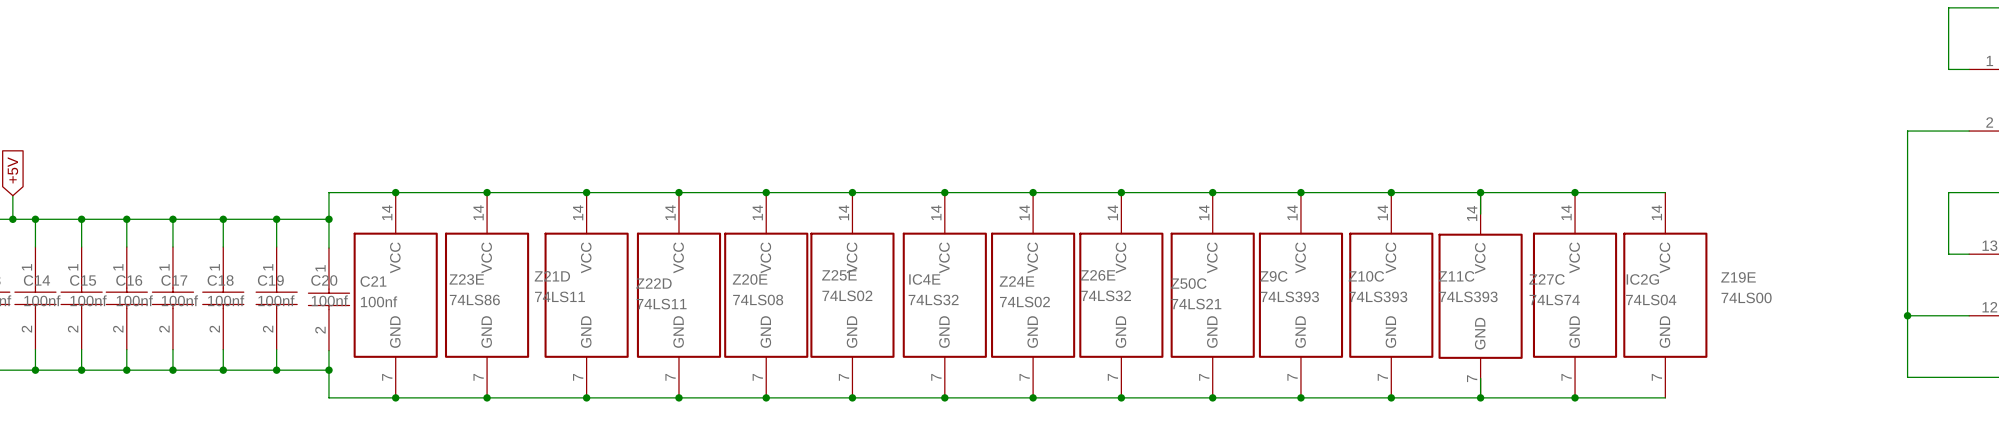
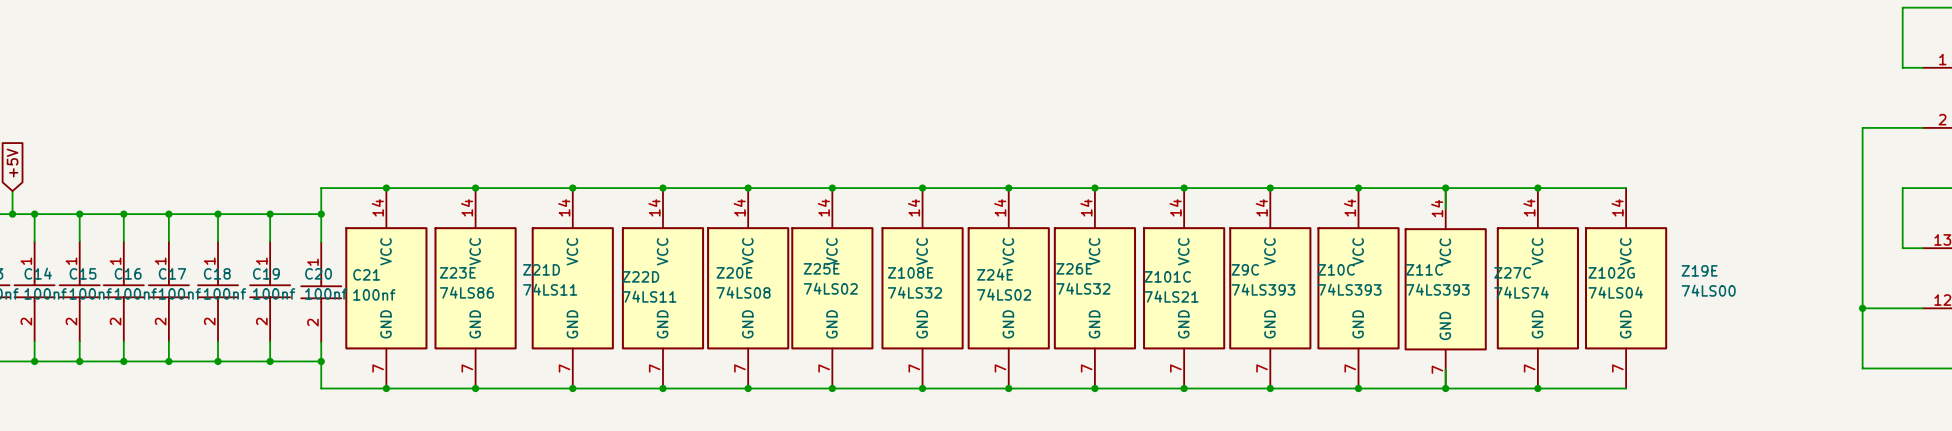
IC4E name: IC4E (924, 279) -> Z108E (910, 272)
IC2G name: IC2G (1642, 279) -> Z102G (1611, 272)
Z50C name: Z50C (1188, 283) -> Z101C (1167, 276)

